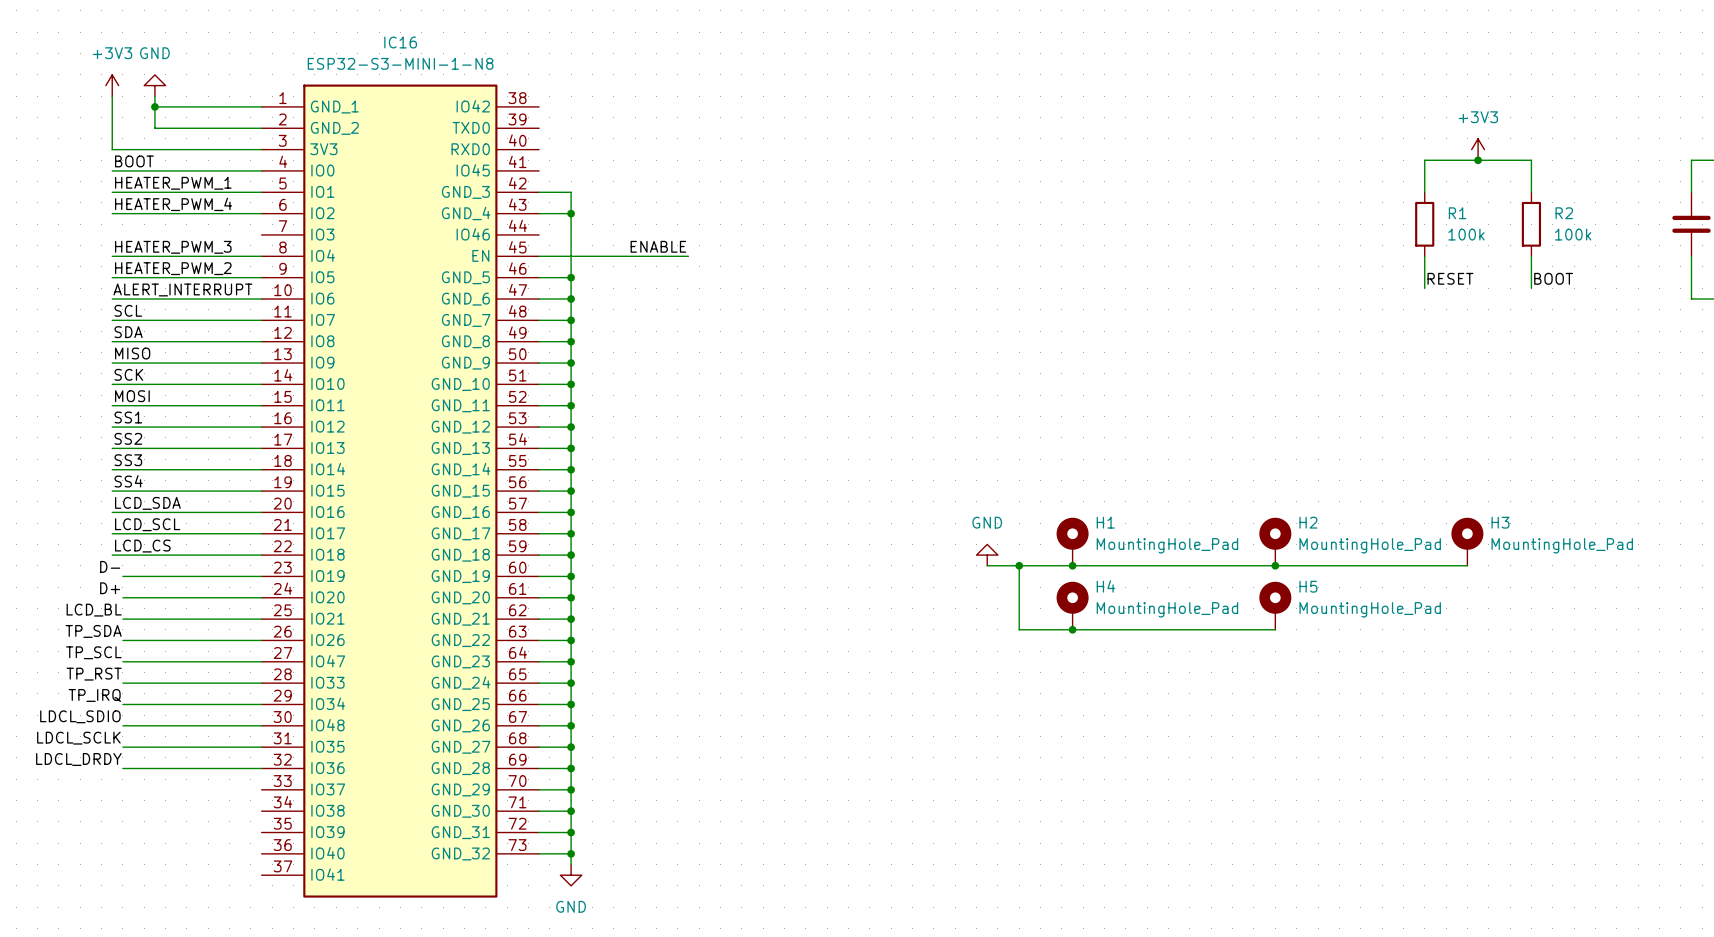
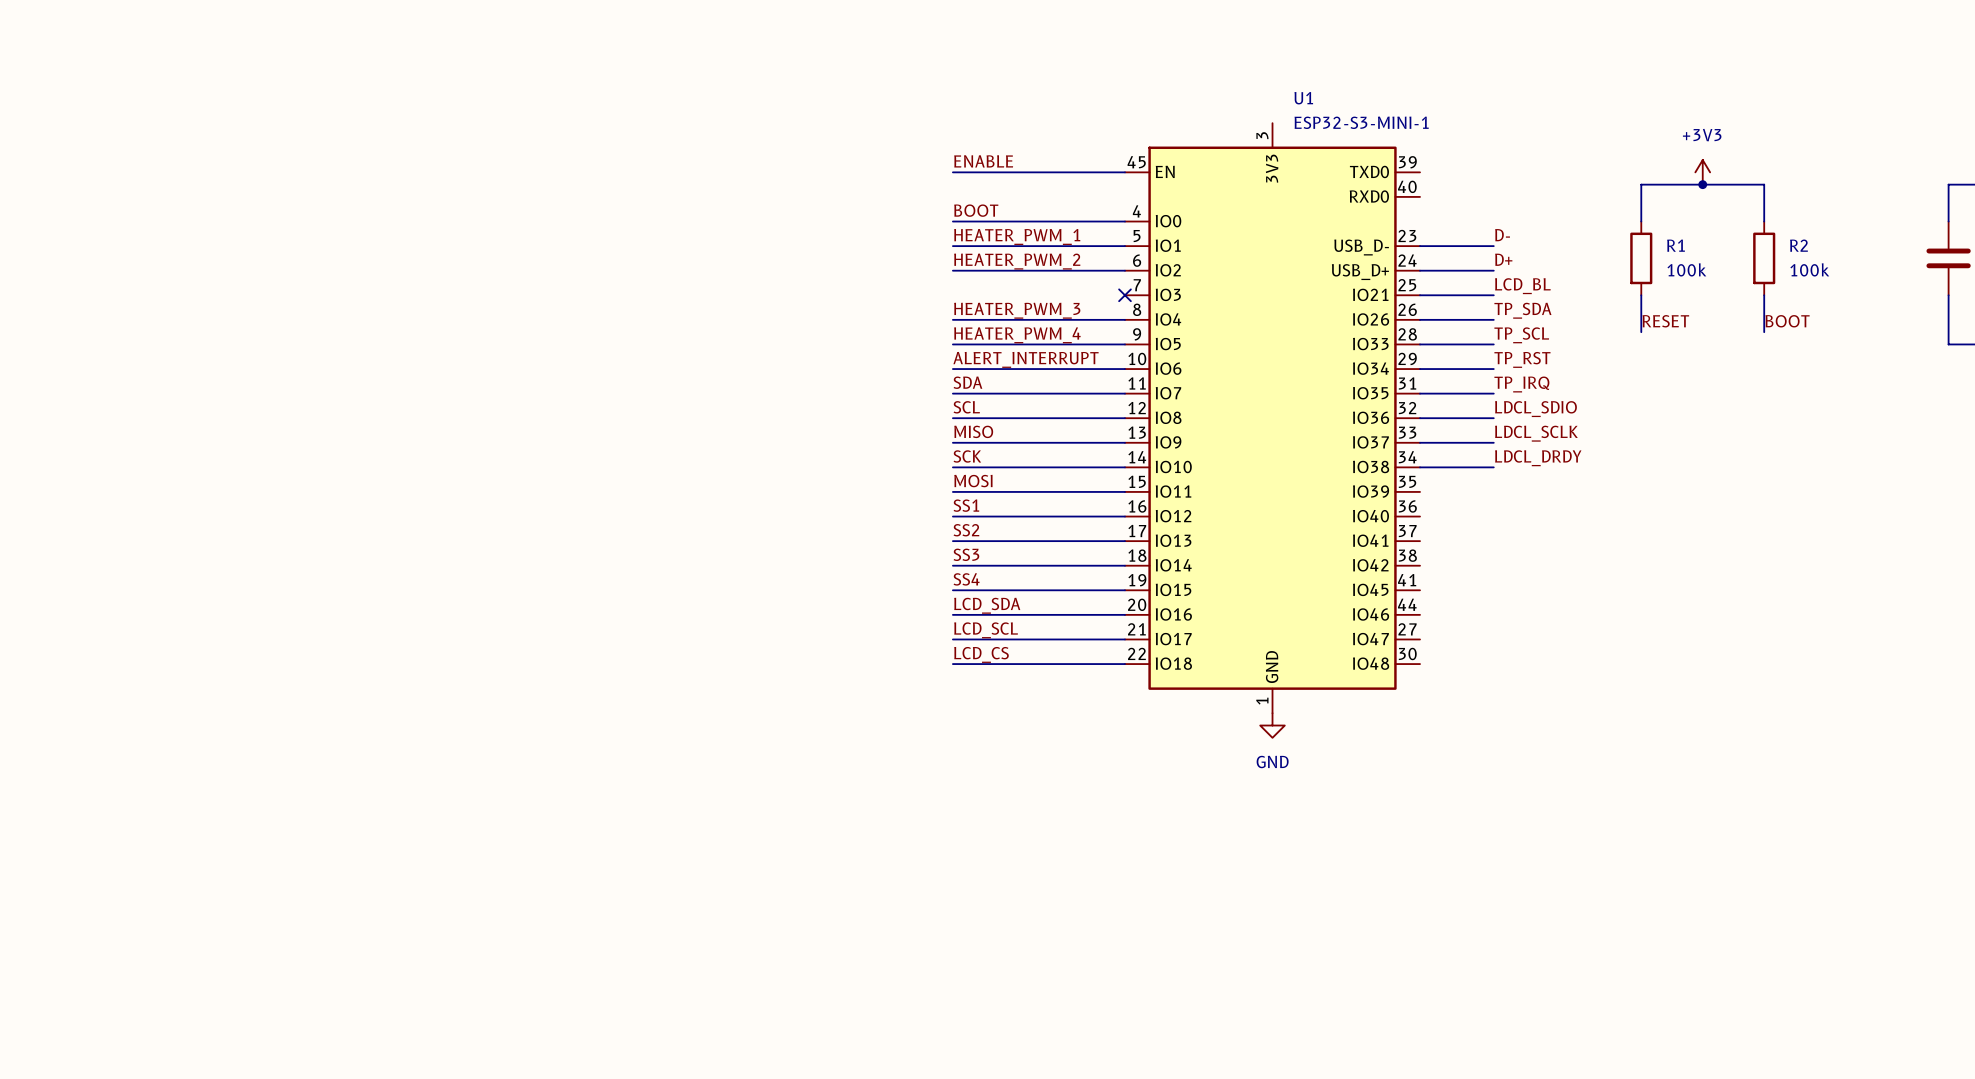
power symbol: +3V3 (112, 85) -> none
power symbol: GND (154, 85) -> none
wire: (112, 96) (112, 149) (261, 149) -> none
wire: (154, 96) (154, 128) (261, 128) -> none
wire: (154, 106) (261, 106) -> none
junction: (154, 106) -> none
wire: none -> (952, 172) (1125, 172)
label: BOOT (134, 161) -> none
wire: (112, 170) (261, 170) -> none
label: none -> BOOT (976, 210)
label: HEATER_PWM_1 (173, 183) -> none
wire: (112, 192) (261, 192) -> none
wire: (539, 192) (571, 192) (571, 864) -> none
wire: none -> (952, 221) (1125, 221)
label: HEATER_PWM_4 (173, 204) -> none
label: none -> HEATER_PWM_1 (1017, 236)
label: none -> D- (1502, 235)
wire: (112, 213) (261, 213) -> none
wire: (539, 213) (571, 213) -> none
junction: (571, 213) -> none
wire: none -> (952, 246) (1125, 246)
wire: none -> (1420, 246) (1493, 246)
label: none -> HEATER_PWM_2 (1017, 261)
label: none -> D+ (1503, 259)
wire: none -> (952, 270) (1125, 270)
wire: none -> (1420, 270) (1493, 270)
label position: ENABLE (658, 246) -> ENABLE (983, 161)
label: HEATER_PWM_3 (173, 247) -> none
label: none -> LCD_BL (1522, 286)
wire: (112, 256) (261, 256) -> none
wire: (539, 256) (688, 256) -> none
no-connect mark: none -> (1125, 295)
wire: none -> (1420, 295) (1493, 295)
label: HEATER_PWM_2 (173, 268) -> none
label: none -> HEATER_PWM_3 (1017, 310)
label: none -> TP_SDA (1522, 310)
wire: (112, 277) (261, 277) -> none
wire: (539, 277) (571, 277) -> none
junction: (571, 277) -> none
wire: none -> (952, 319) (1125, 319)
wire: none -> (1420, 319) (1493, 319)
label: ALERT_INTERRUPT (182, 289) -> none
label: none -> HEATER_PWM_4 (1017, 335)
label: none -> TP_SCL (1521, 335)
wire: (112, 299) (261, 299) -> none
wire: (539, 299) (571, 299) -> none
junction: (571, 299) -> none
wire: none -> (952, 344) (1125, 344)
wire: none -> (1420, 344) (1493, 344)
label: SCL (128, 310) -> none
label: none -> ALERT_INTERRUPT (1026, 359)
label: none -> TP_RST (1522, 359)
wire: (112, 320) (261, 320) -> none
wire: (539, 320) (571, 320) -> none
junction: (571, 320) -> none
wire: none -> (952, 369) (1125, 369)
wire: none -> (1420, 369) (1493, 369)
label: SDA (128, 332) -> none
label: none -> SDA (967, 382)
label: none -> TP_IRQ (1521, 384)
wire: (112, 341) (261, 341) -> none
wire: (539, 341) (571, 341) -> none
junction: (571, 341) -> none
wire: none -> (952, 393) (1125, 393)
wire: none -> (1420, 393) (1493, 393)
label: MISO (132, 353) -> none
label: none -> SCL (966, 407)
label: none -> LDCL_SDIO (1535, 409)
wire: (112, 363) (261, 363) -> none
wire: (539, 363) (571, 363) -> none
junction: (571, 363) -> none
wire: none -> (952, 418) (1125, 418)
U1: none -> ESP32-S3-MINI-1 (1272, 418)
wire: none -> (1420, 418) (1493, 418)
label: SCK (128, 374) -> none
label: none -> MISO (973, 431)
label: none -> LDCL_SCLK (1536, 433)
wire: (112, 384) (261, 384) -> none
wire: (539, 384) (571, 384) -> none
junction: (571, 384) -> none
wire: none -> (952, 442) (1125, 442)
wire: none -> (1420, 442) (1493, 442)
label: MOSI (132, 396) -> none
label: none -> SCK (967, 456)
label: none -> LDCL_DRDY (1538, 458)
wire: (112, 405) (261, 405) -> none
wire: (539, 405) (571, 405) -> none
junction: (571, 405) -> none
wire: none -> (952, 467) (1125, 467)
wire: none -> (1420, 467) (1493, 467)
label: SS1 (128, 417) -> none
label: none -> MOSI (973, 481)
wire: (112, 427) (261, 427) -> none
wire: (539, 427) (571, 427) -> none
junction: (571, 427) -> none
wire: none -> (952, 491) (1125, 491)
label: SS2 (128, 438) -> none
label: none -> SS1 (966, 505)
wire: (112, 448) (261, 448) -> none
wire: (539, 448) (571, 448) -> none
junction: (571, 448) -> none
wire: none -> (952, 516) (1125, 516)
label: SS3 (128, 460) -> none
label: none -> SS2 (966, 530)
wire: (112, 469) (261, 469) -> none
wire: (539, 469) (571, 469) -> none
junction: (571, 469) -> none
wire: none -> (952, 541) (1125, 541)
label: SS4 (128, 481) -> none
label: none -> SS3 (966, 554)
wire: (112, 491) (261, 491) -> none
IC16: ESP32-S3-MINI-1-N8 (400, 491) -> none
wire: (539, 491) (571, 491) -> none
junction: (571, 491) -> none
wire: none -> (952, 565) (1125, 565)
label: none -> SS4 (966, 579)
label: LCD_SDA (147, 503) -> none
wire: (112, 512) (261, 512) -> none
wire: (539, 512) (571, 512) -> none
junction: (571, 512) -> none
wire: none -> (952, 590) (1125, 590)
label: LCD_SCL (147, 524) -> none
label: none -> LCD_SDA (987, 605)
wire: (112, 533) (261, 533) -> none
wire: (539, 533) (571, 533) -> none
junction: (571, 533) -> none
wire: none -> (952, 614) (1125, 614)
H1: MountingHole_Pad (1072, 541) -> none
H2: MountingHole_Pad (1275, 541) -> none
H3: MountingHole_Pad (1467, 541) -> none
label: LCD_CS (142, 546) -> none
label: none -> LCD_SCL (986, 630)
wire: (112, 555) (261, 555) -> none
wire: (539, 555) (571, 555) -> none
junction: (571, 555) -> none
wire: none -> (952, 639) (1125, 639)
power symbol rotation: 0° (987, 555) -> 180° (1272, 725)
power symbol position: GND (987, 555) -> GND (1272, 725)
wire: (987, 565) (1467, 565) -> none
wire: (1019, 565) (1019, 629) (1275, 629) -> none
junction: (1019, 565) -> none
junction: (1072, 565) -> none
junction: (1275, 565) -> none
label: D- (110, 566) -> none
label: none -> LCD_CS (981, 654)
wire: (122, 576) (261, 576) -> none
wire: (539, 576) (571, 576) -> none
junction: (571, 576) -> none
wire: none -> (952, 664) (1125, 664)
label: D+ (110, 588) -> none
wire: (122, 597) (261, 597) -> none
wire: (539, 597) (571, 597) -> none
junction: (571, 597) -> none
H4: MountingHole_Pad (1072, 605) -> none
H5: MountingHole_Pad (1275, 605) -> none
label: LCD_BL (94, 610) -> none
wire: (122, 619) (261, 619) -> none
wire: (539, 619) (571, 619) -> none
junction: (571, 619) -> none
junction: (1072, 629) -> none
label: TP_SDA (93, 631) -> none
wire: (122, 640) (261, 640) -> none
wire: (539, 640) (571, 640) -> none
junction: (571, 640) -> none
label: TP_SCL (93, 652) -> none
wire: (122, 661) (261, 661) -> none
wire: (539, 661) (571, 661) -> none
junction: (571, 661) -> none
label: TP_RST (94, 674) -> none
wire: (122, 683) (261, 683) -> none
wire: (539, 683) (571, 683) -> none
junction: (571, 683) -> none
label: TP_IRQ (94, 695) -> none
wire: (122, 704) (261, 704) -> none
wire: (539, 704) (571, 704) -> none
junction: (571, 704) -> none
label: LDCL_SDIO (80, 716) -> none
wire: (122, 725) (261, 725) -> none
wire: (539, 725) (571, 725) -> none
junction: (571, 725) -> none
label: LDCL_SCLK (78, 738) -> none
wire: (122, 747) (261, 747) -> none
wire: (539, 747) (571, 747) -> none
junction: (571, 747) -> none
label: LDCL_DRDY (78, 759) -> none
wire: (122, 768) (261, 768) -> none
wire: (539, 768) (571, 768) -> none
junction: (571, 768) -> none
wire: (539, 789) (571, 789) -> none
junction: (571, 789) -> none
wire: (539, 811) (571, 811) -> none
junction: (571, 811) -> none
wire: (539, 832) (571, 832) -> none
junction: (571, 832) -> none
wire: (539, 853) (571, 853) -> none
junction: (571, 853) -> none
power symbol: GND (571, 875) -> none

